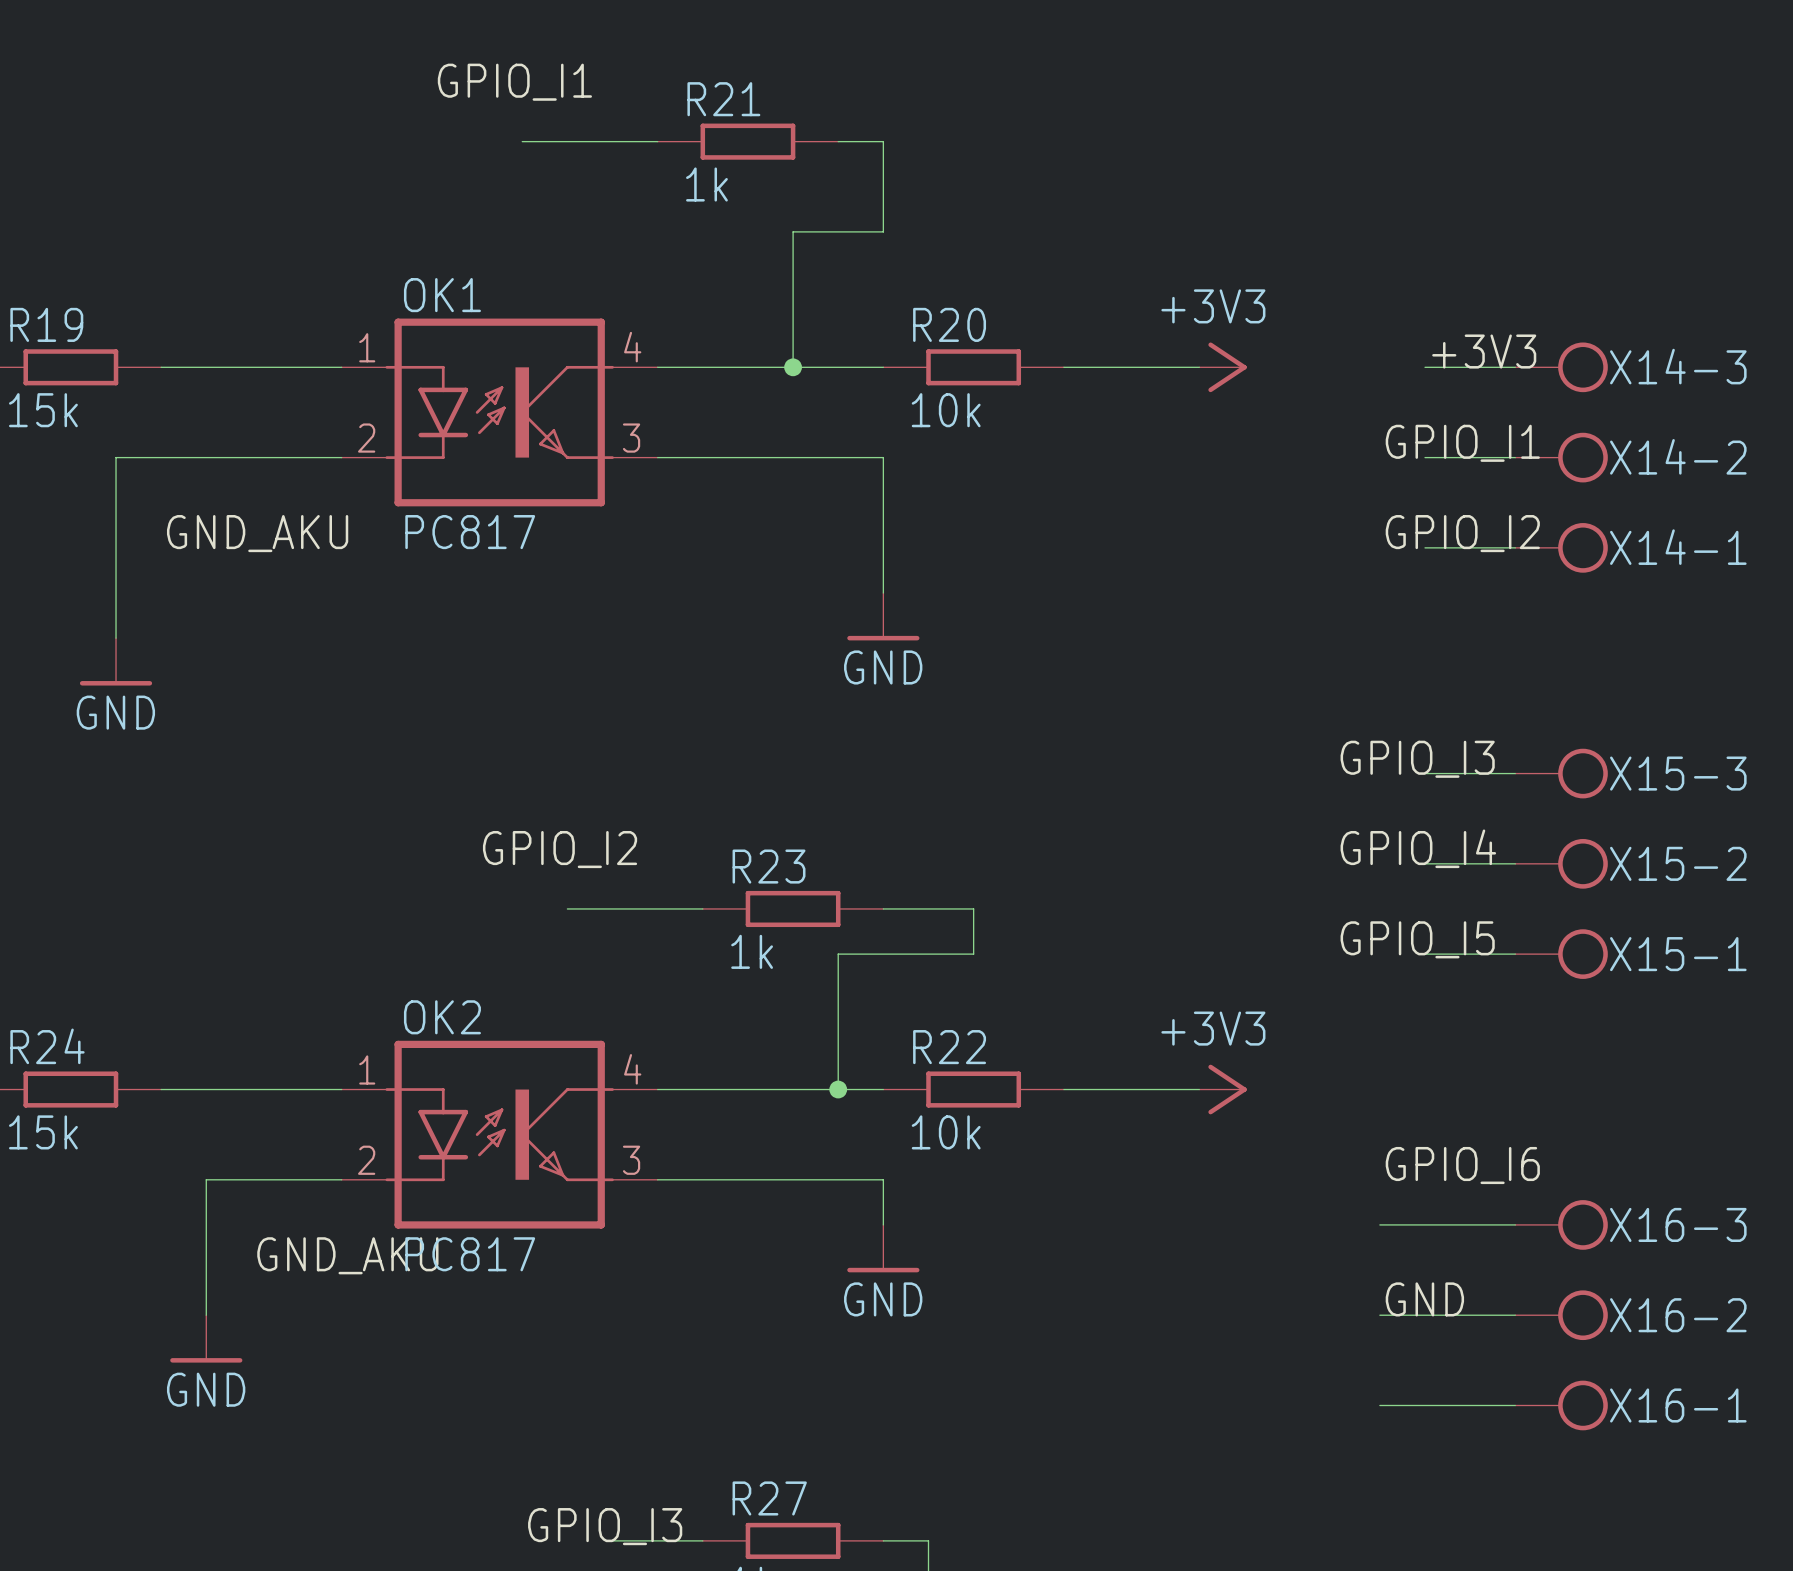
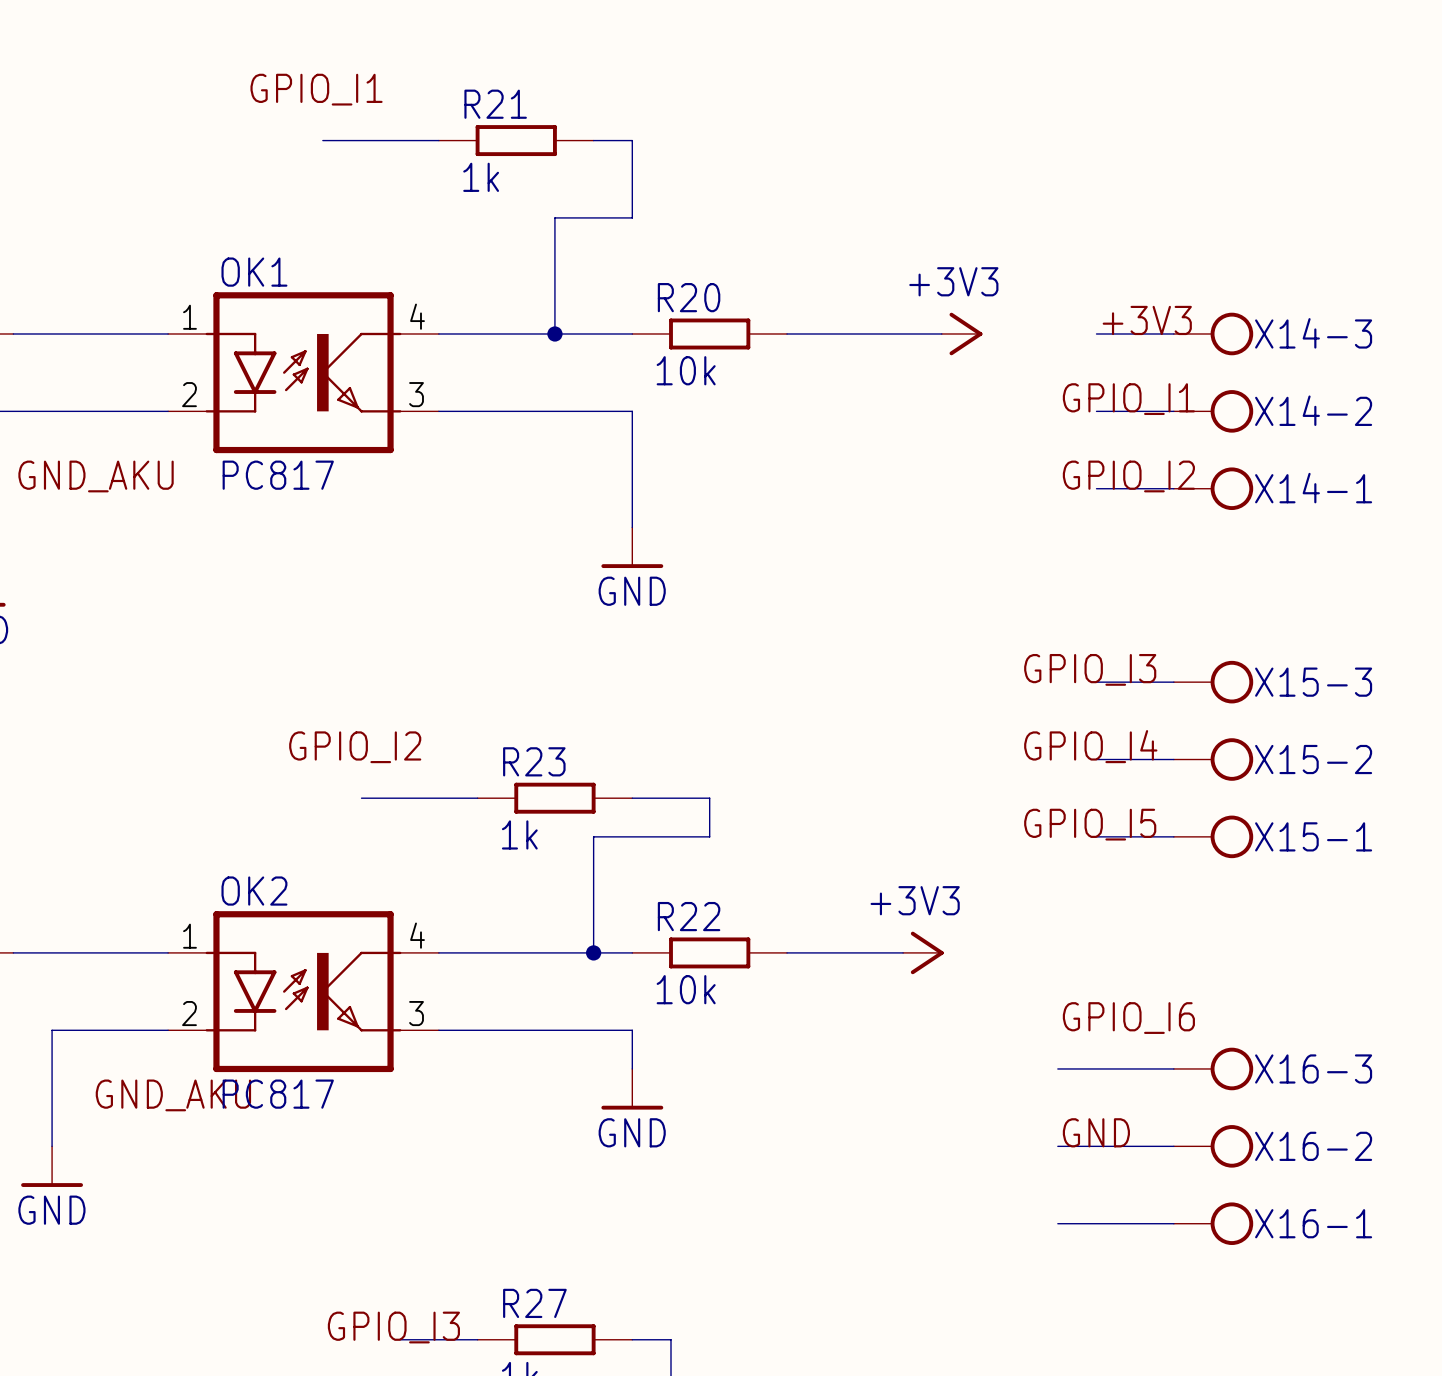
power symbol position: +3V3 (1223, 367) -> +3V3 (962, 333)

